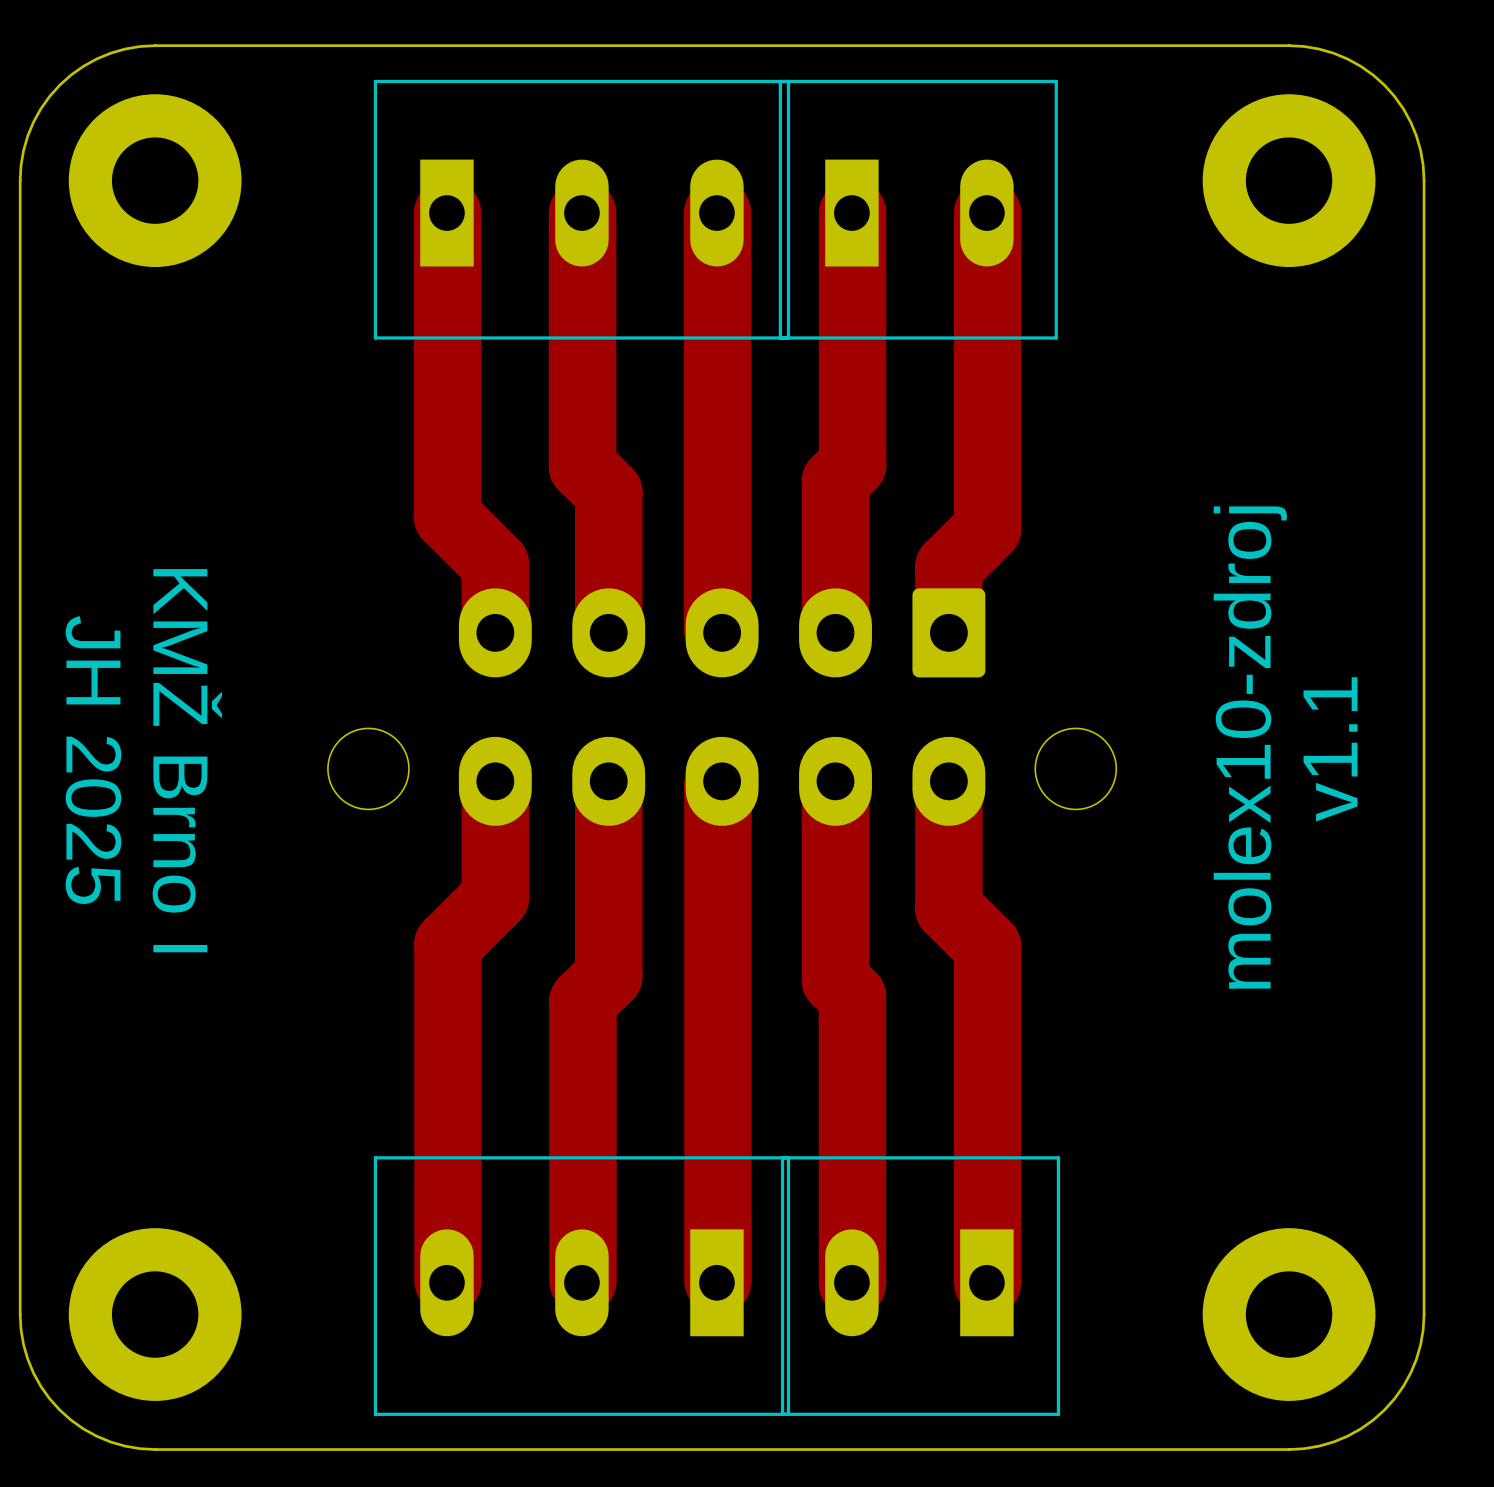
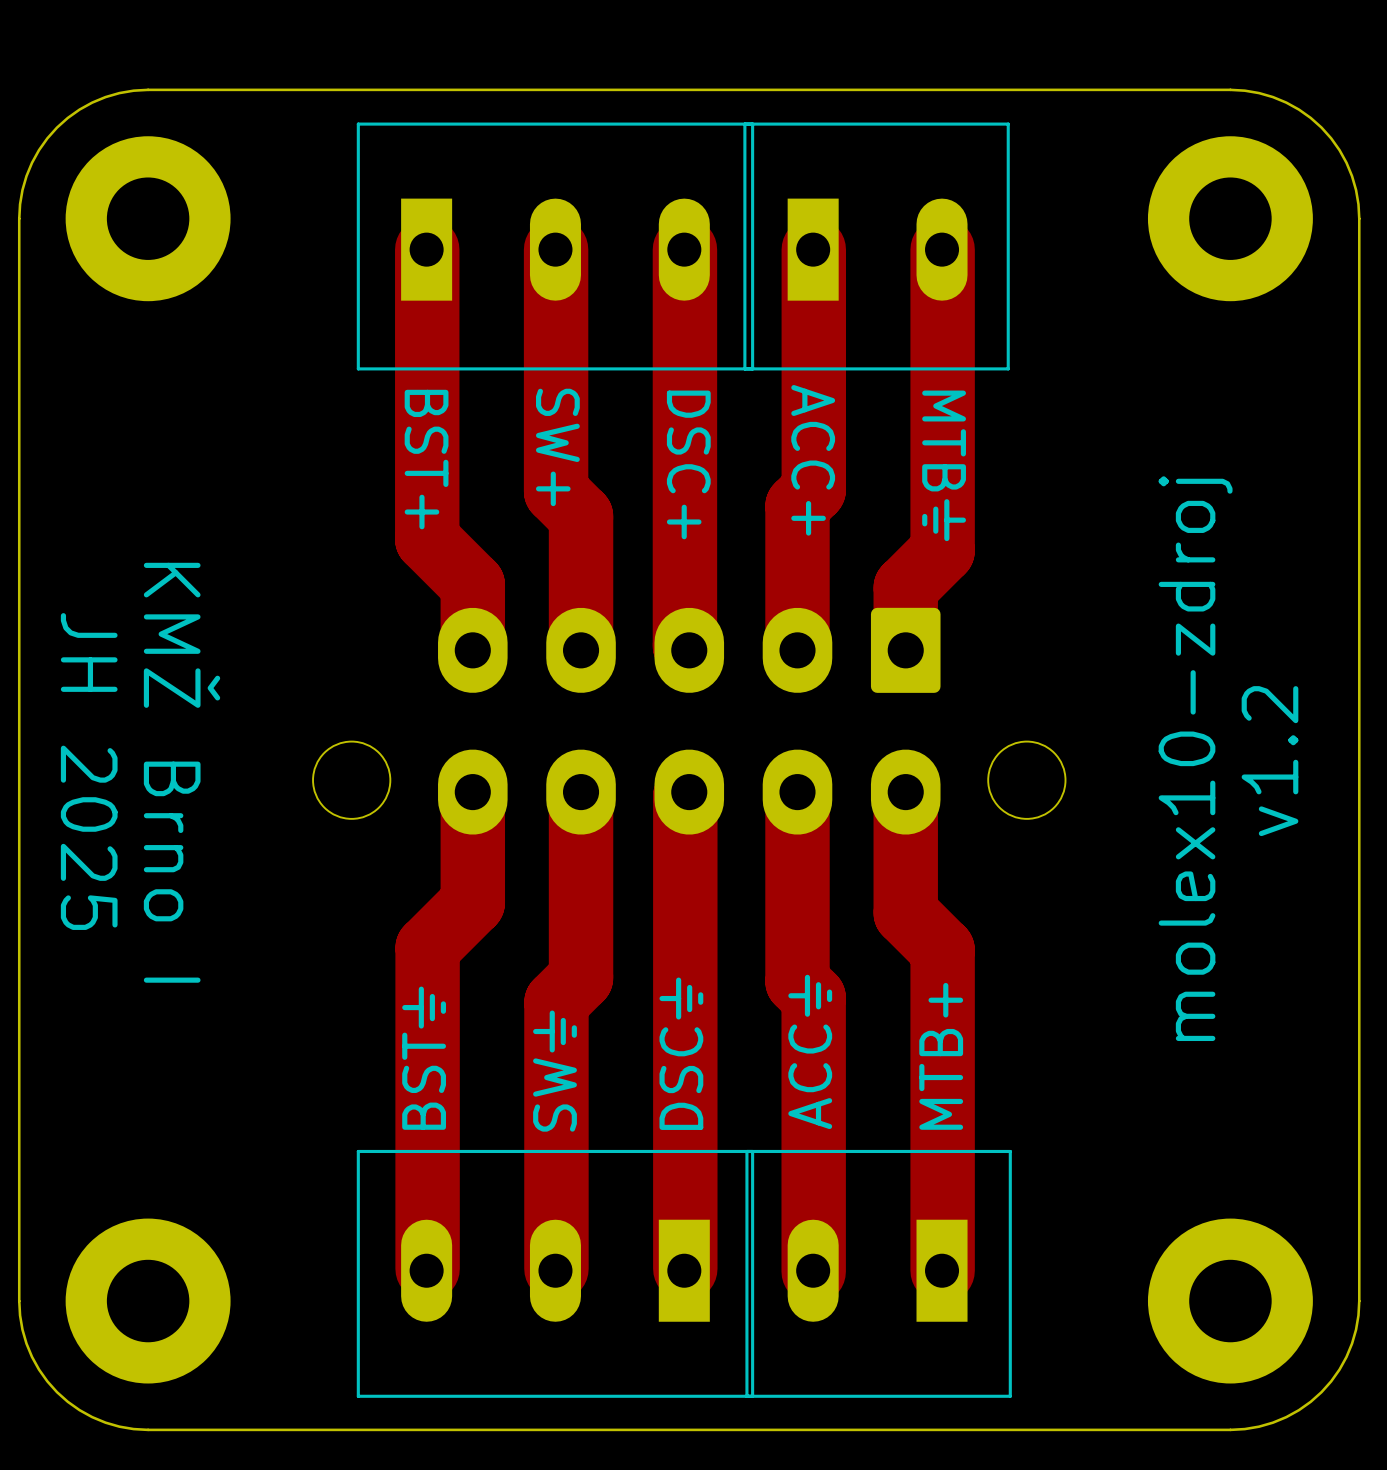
text: none -> SW+ (557, 447)
text: none -> BST+ (426, 459)
text: none -> ACC+ (813, 460)
text: none -> DSC+ (688, 464)
text: none -> MTB⏚ (944, 465)
text: v1.1 (1330, 749) -> v1.2 (1269, 761)
text: none -> ACC⏚ (810, 1051)
text: none -> DSC⏚ (681, 1053)
text: none -> BST⏚ (424, 1058)
text: none -> MTB+ (941, 1056)
text: none -> SW⏚ (555, 1071)

